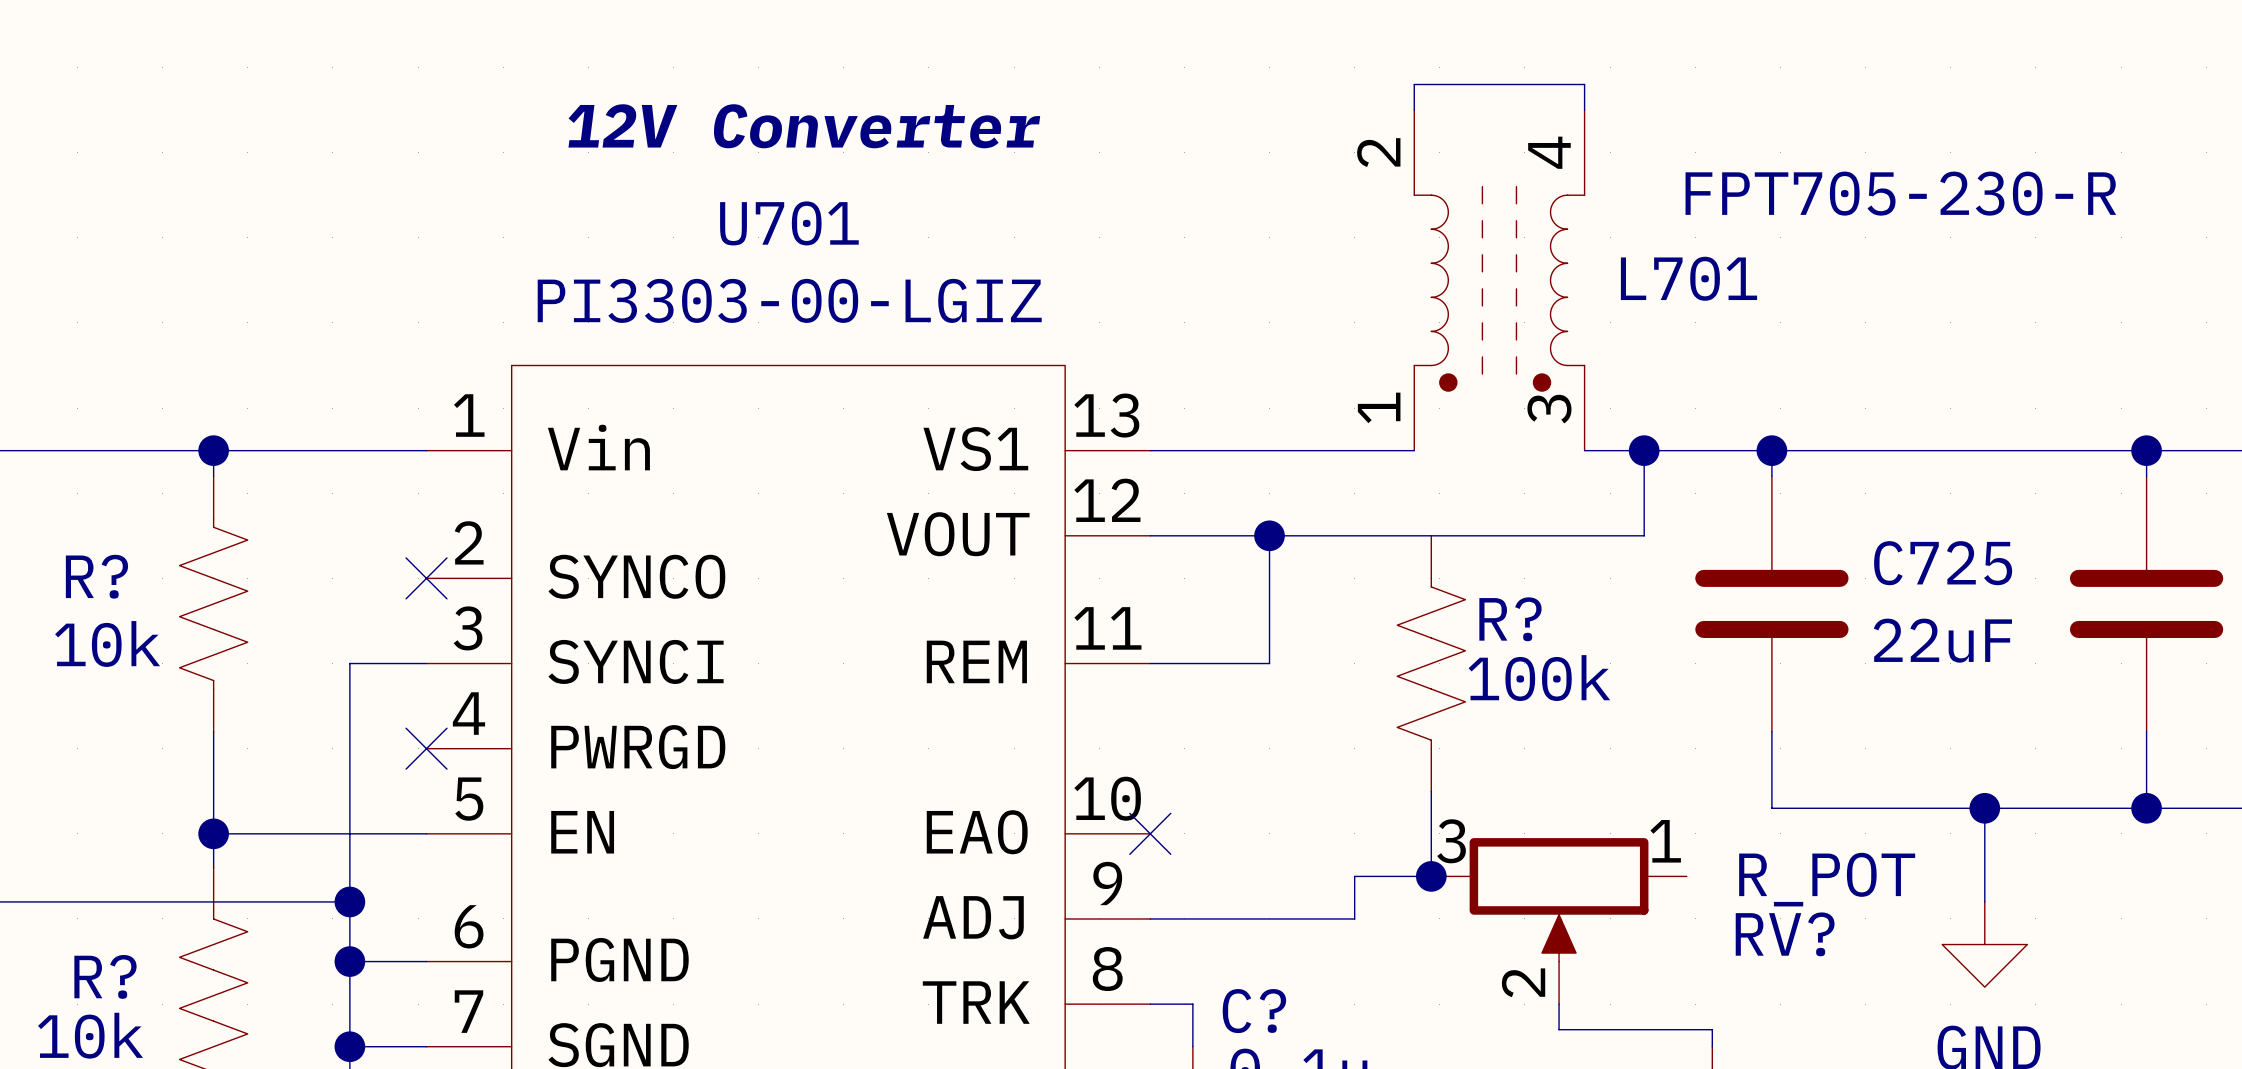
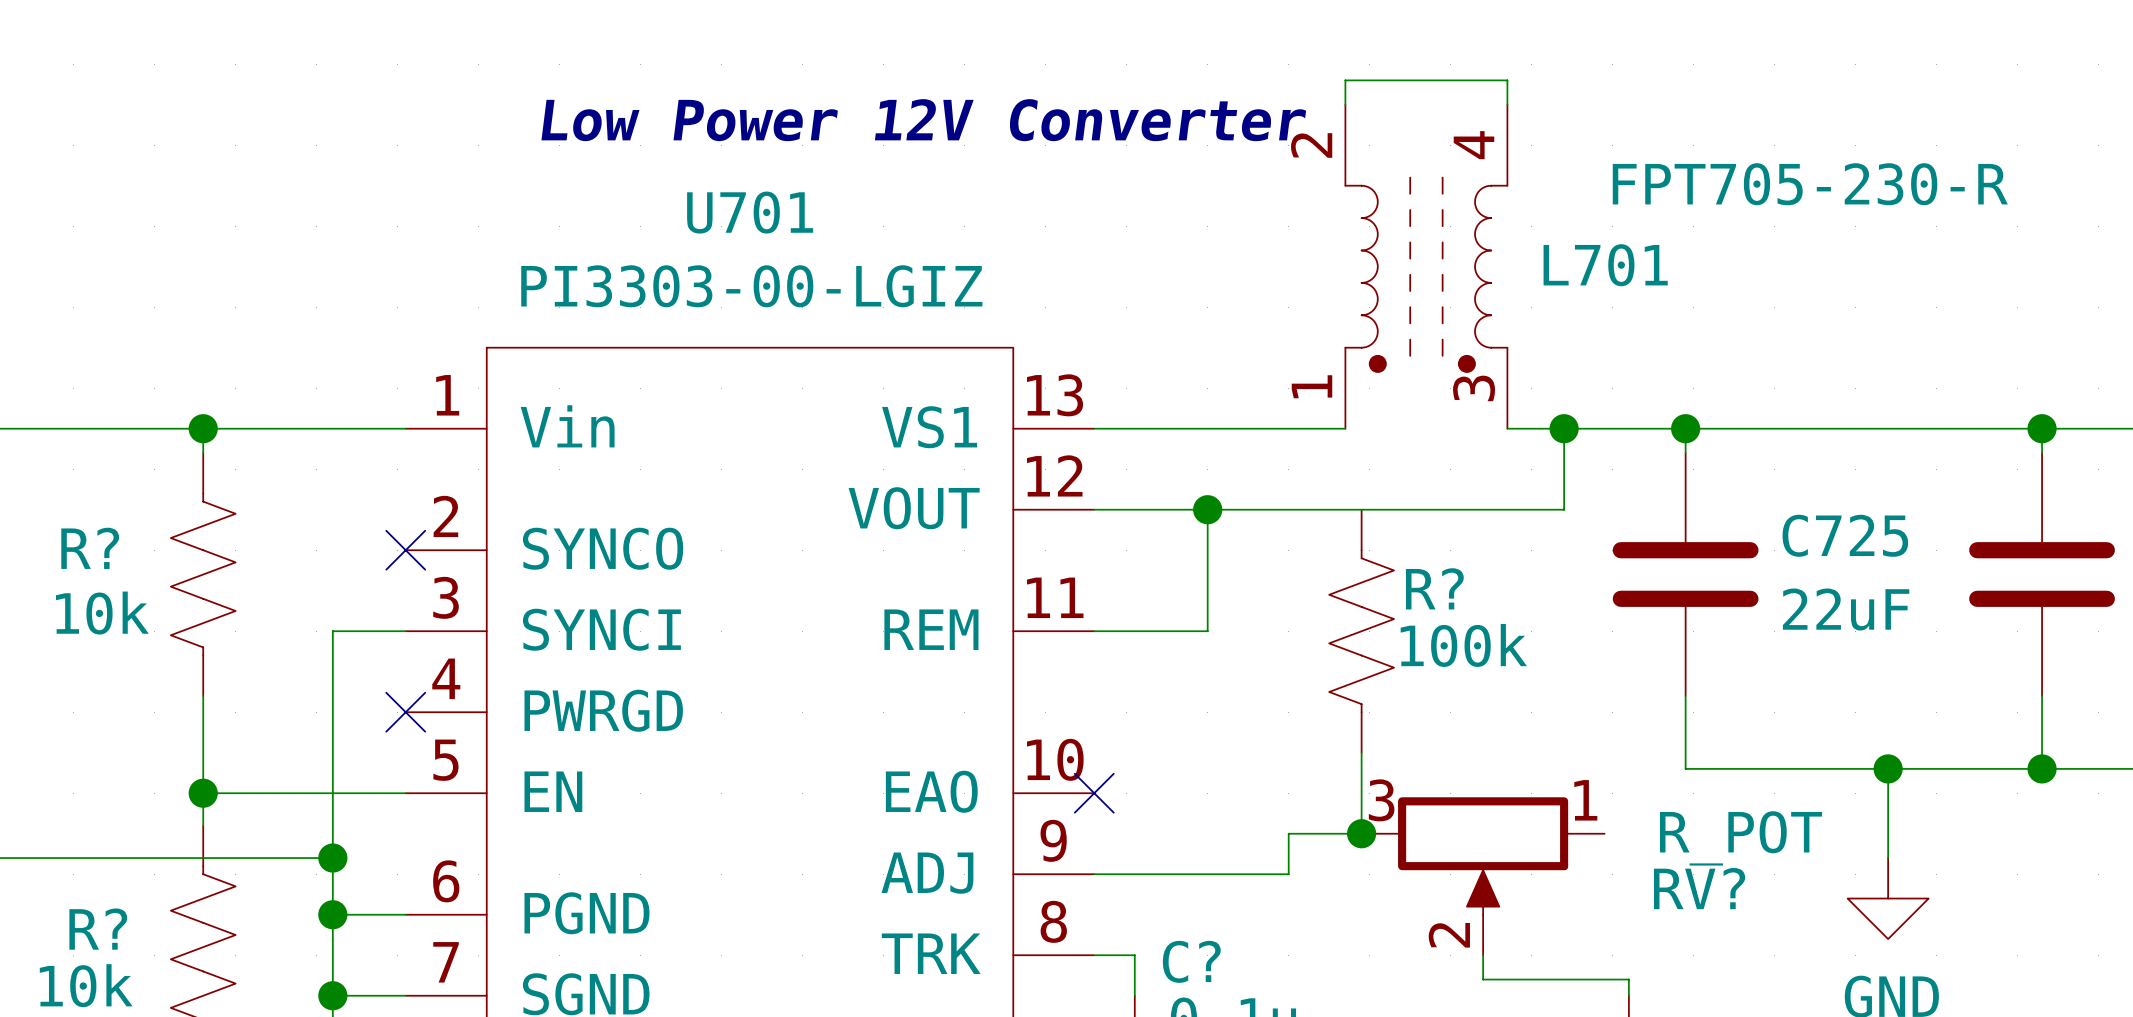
text: 12V Converter (804, 126) -> Low Power 12V Converter (923, 120)

